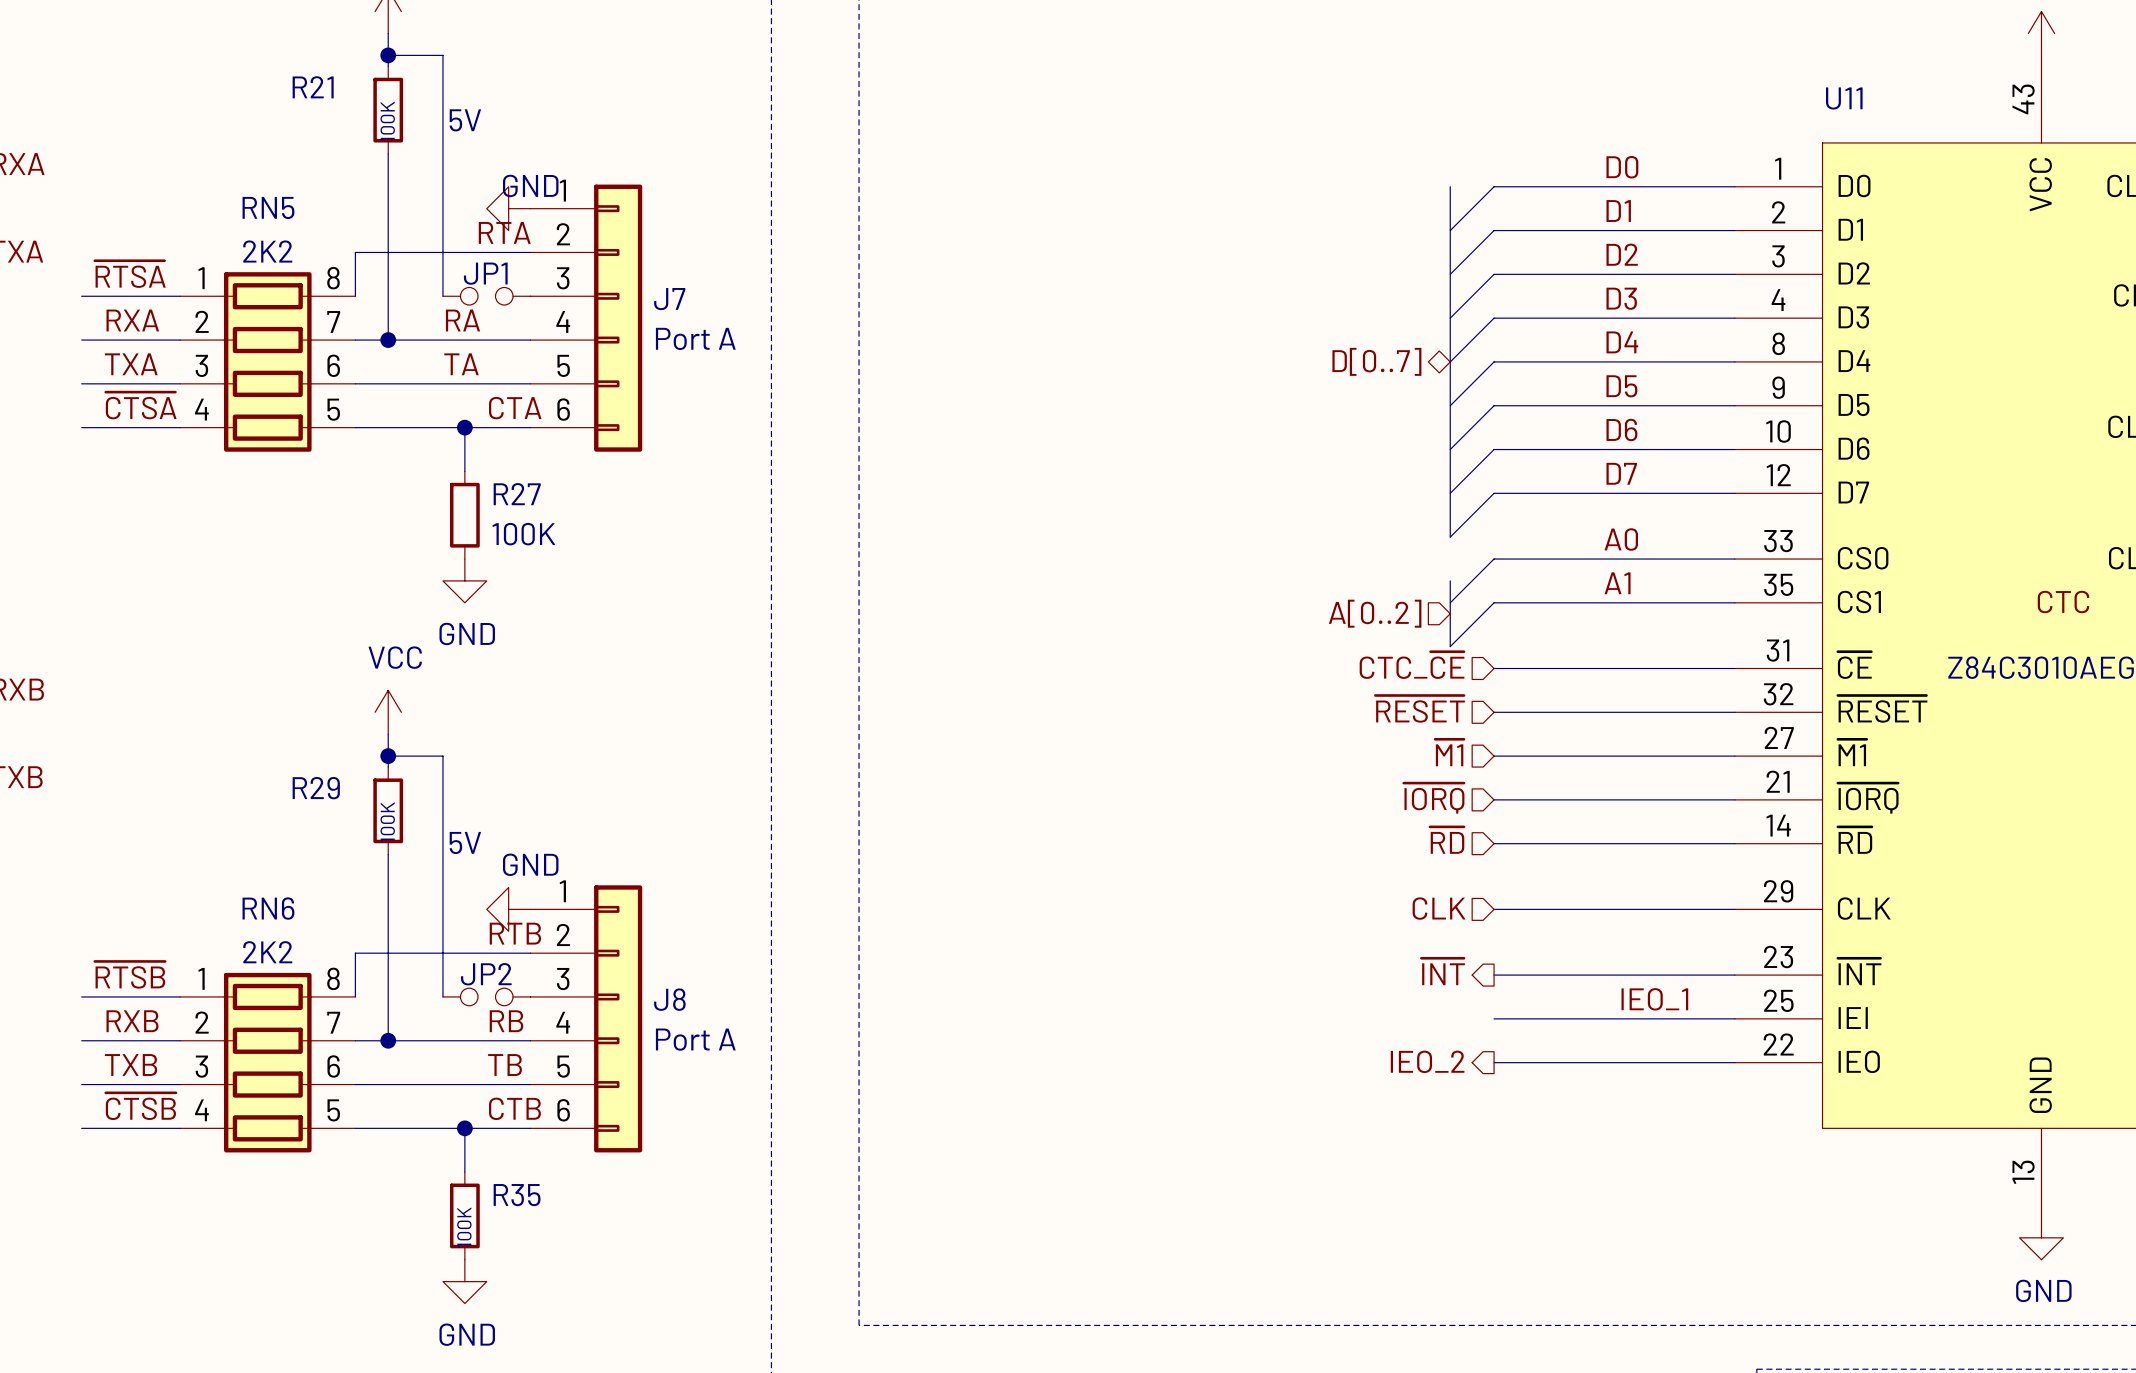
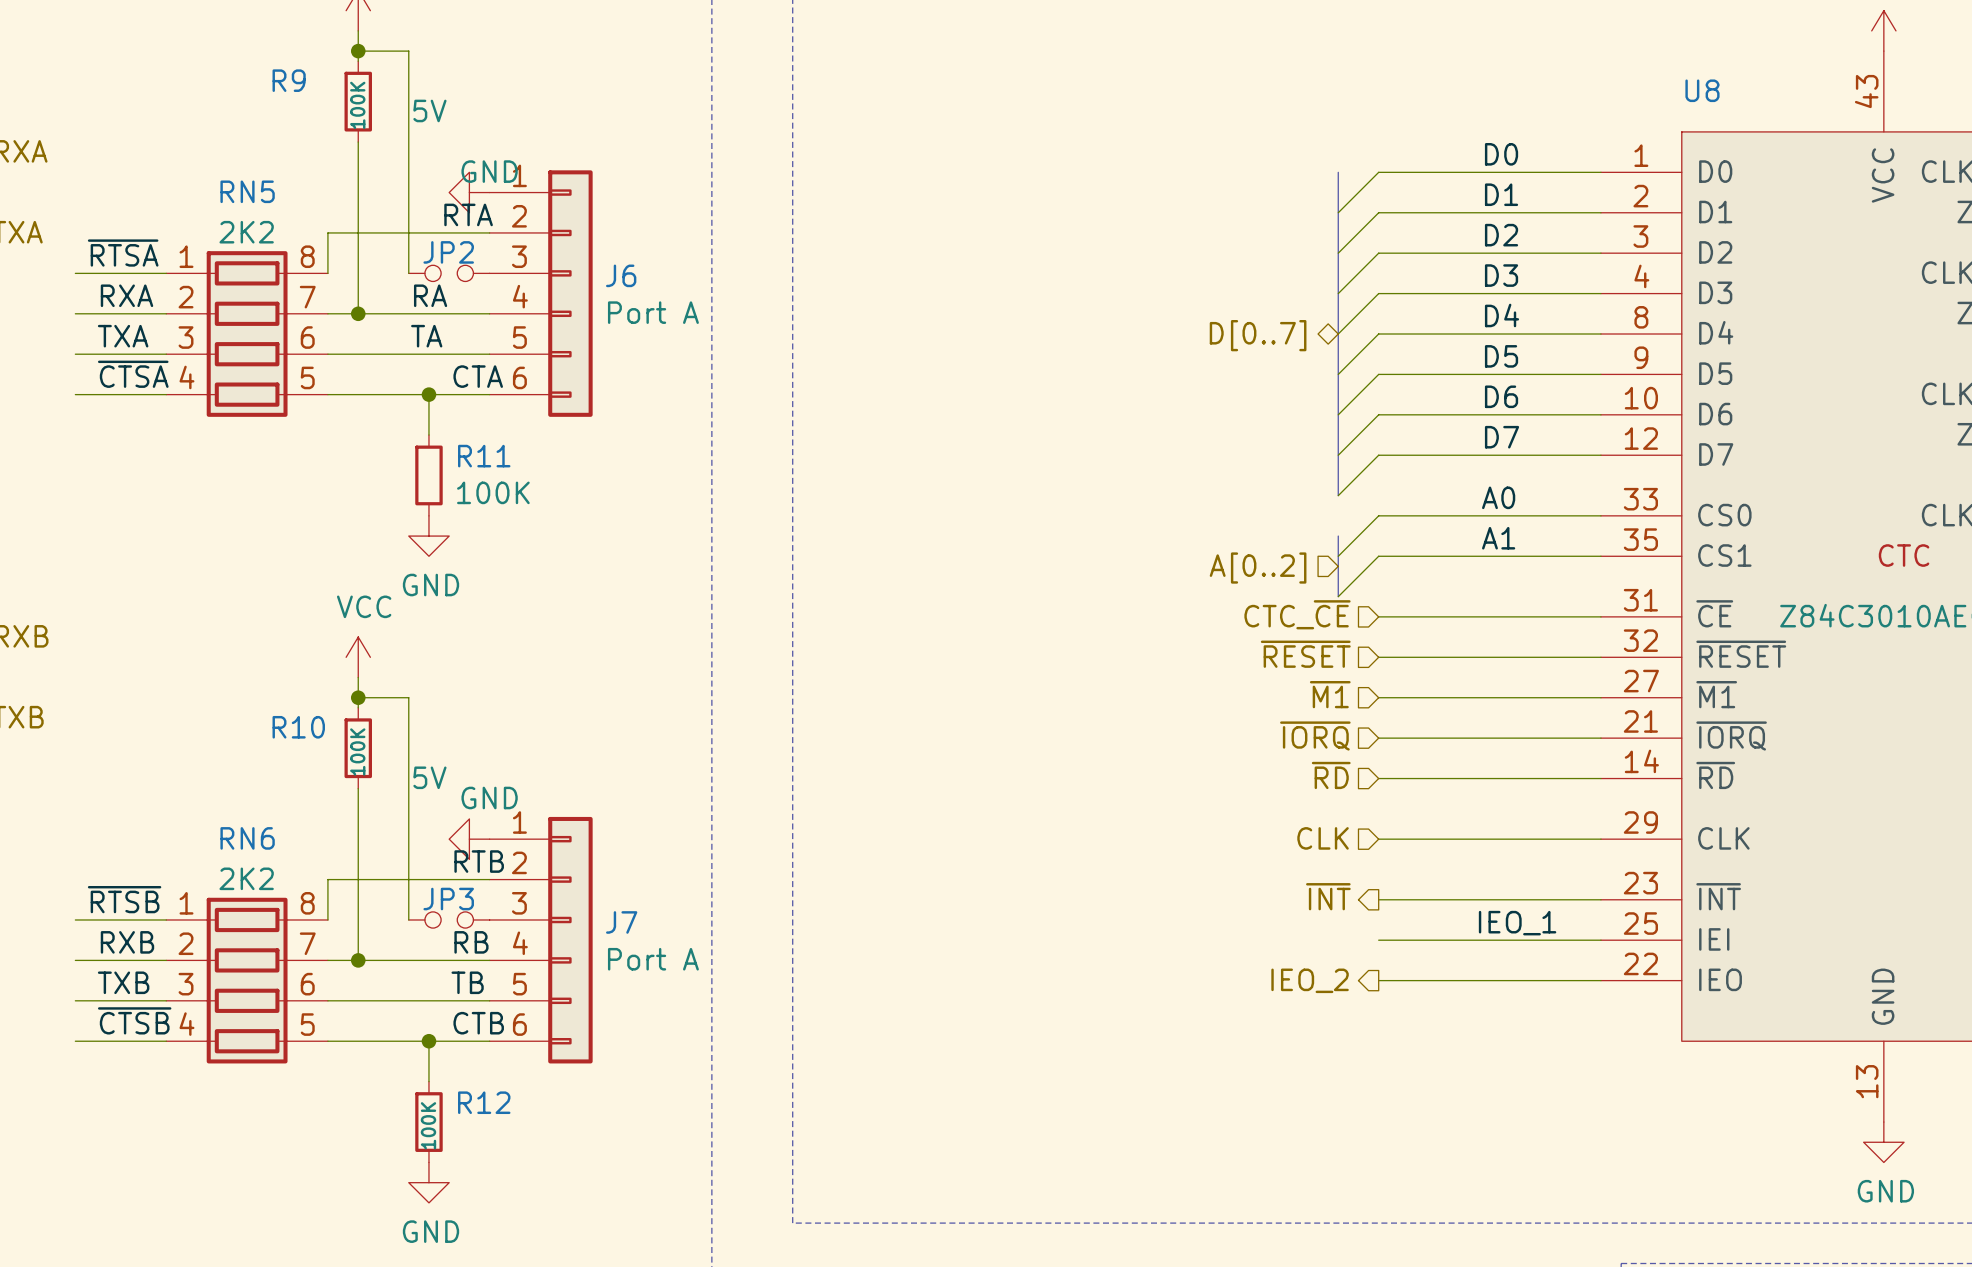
R21 name: R21 (313, 87) -> R9 (289, 80)
U11 name: U11 (1844, 98) -> U8 (1702, 90)
JP1 name: JP1 (485, 273) -> JP2 (448, 252)
J7 name: J7 (669, 299) -> J6 (621, 275)
R27 name: R27 (517, 494) -> R11 (484, 456)
R29 name: R29 (316, 788) -> R10 (298, 727)
JP2 name: JP2 (486, 974) -> JP3 (448, 899)
J8 name: J8 (669, 999) -> J7 (621, 922)
R35 name: R35 (517, 1195) -> R12 (484, 1102)

